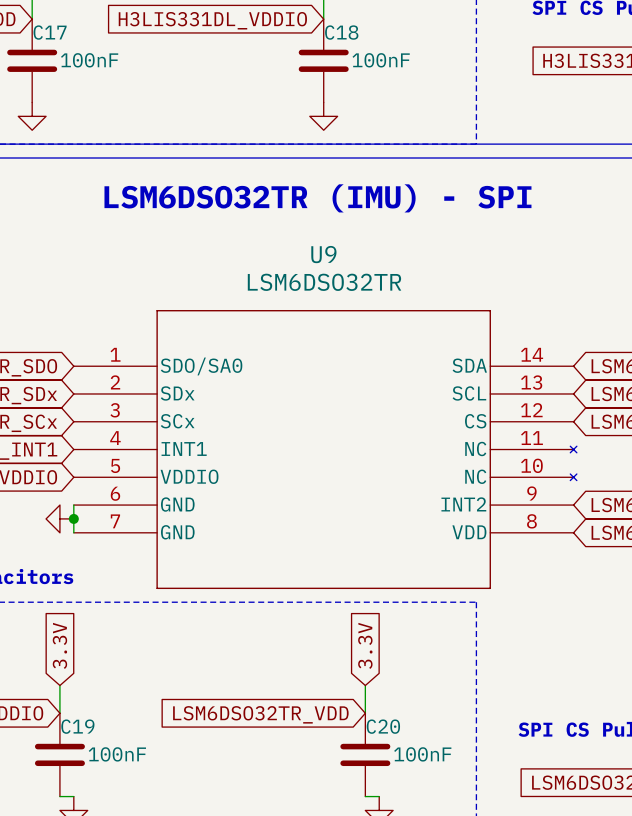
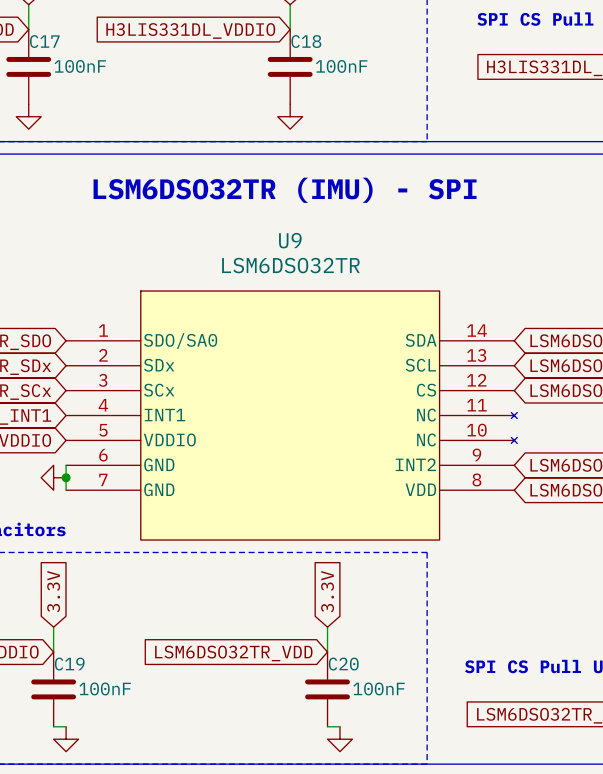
U9 symbol: [73, 310, 577, 590] -> [66, 291, 518, 541]

